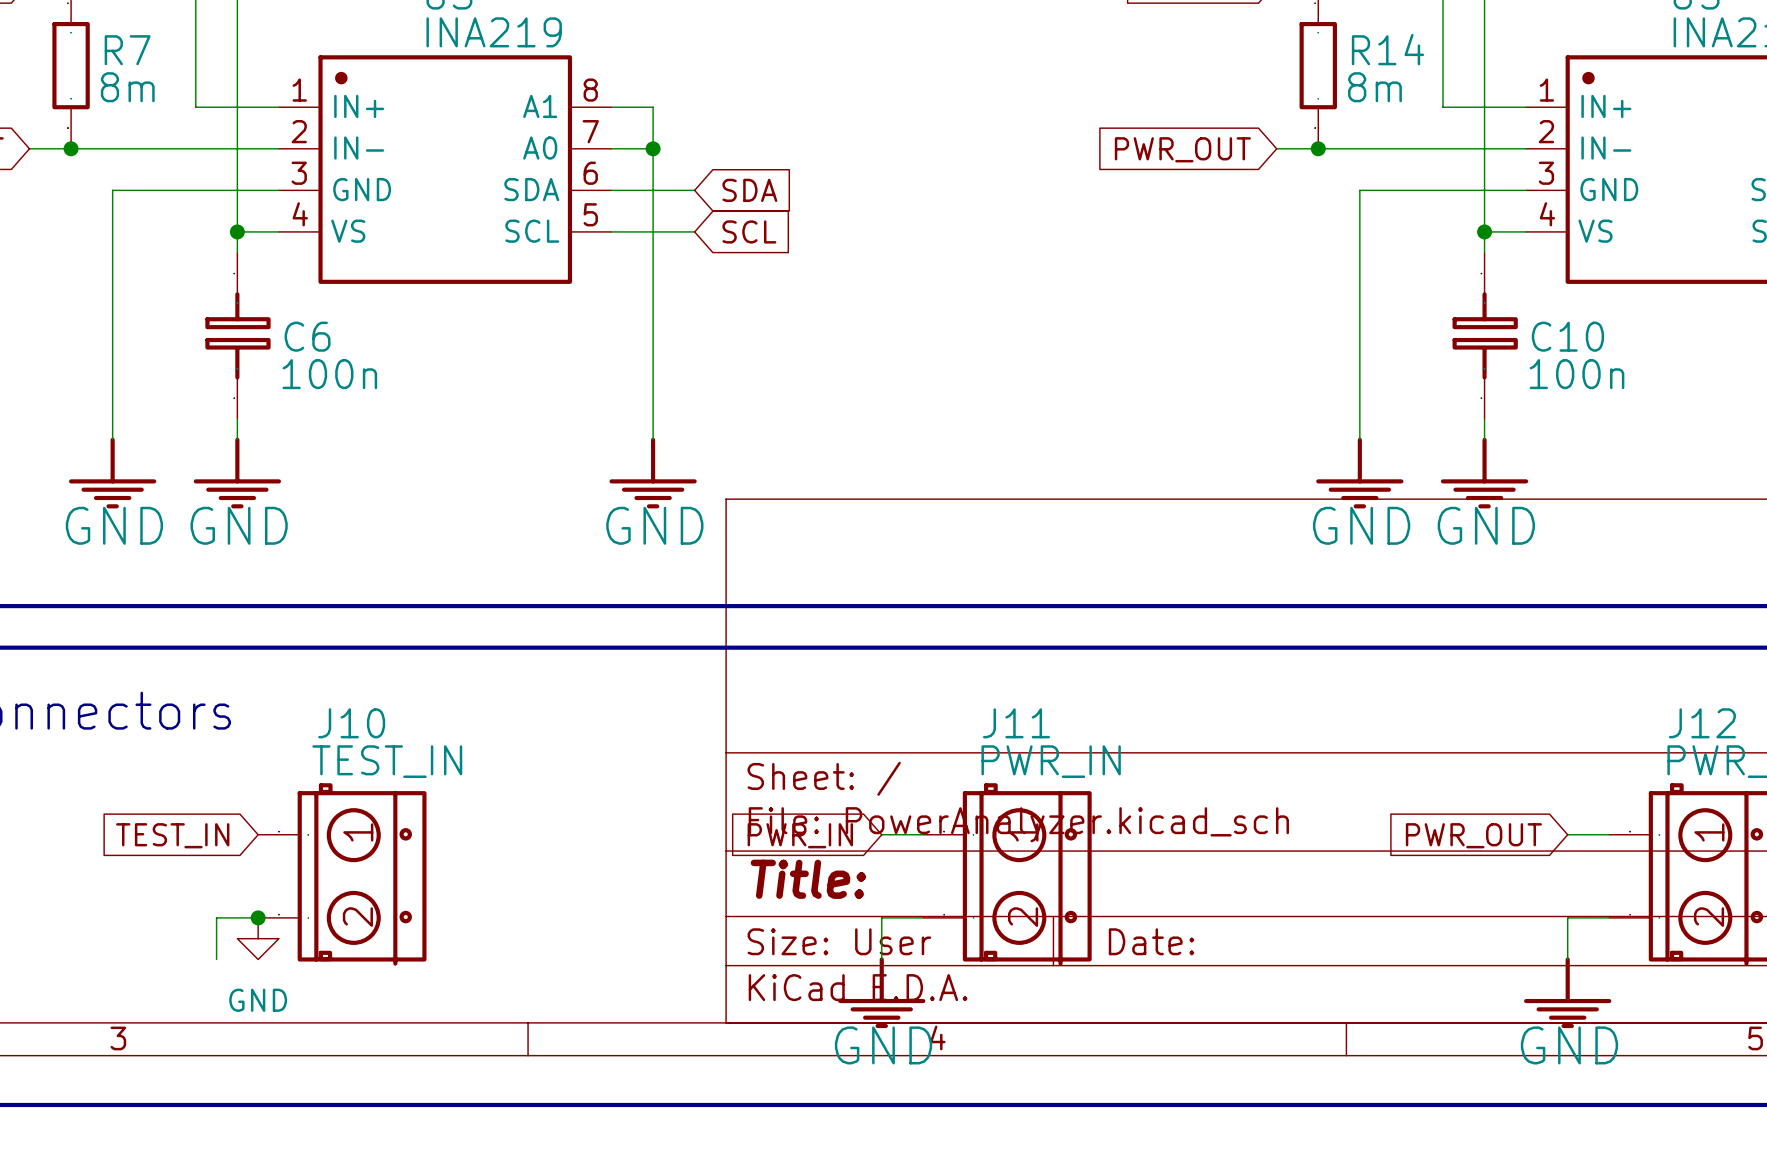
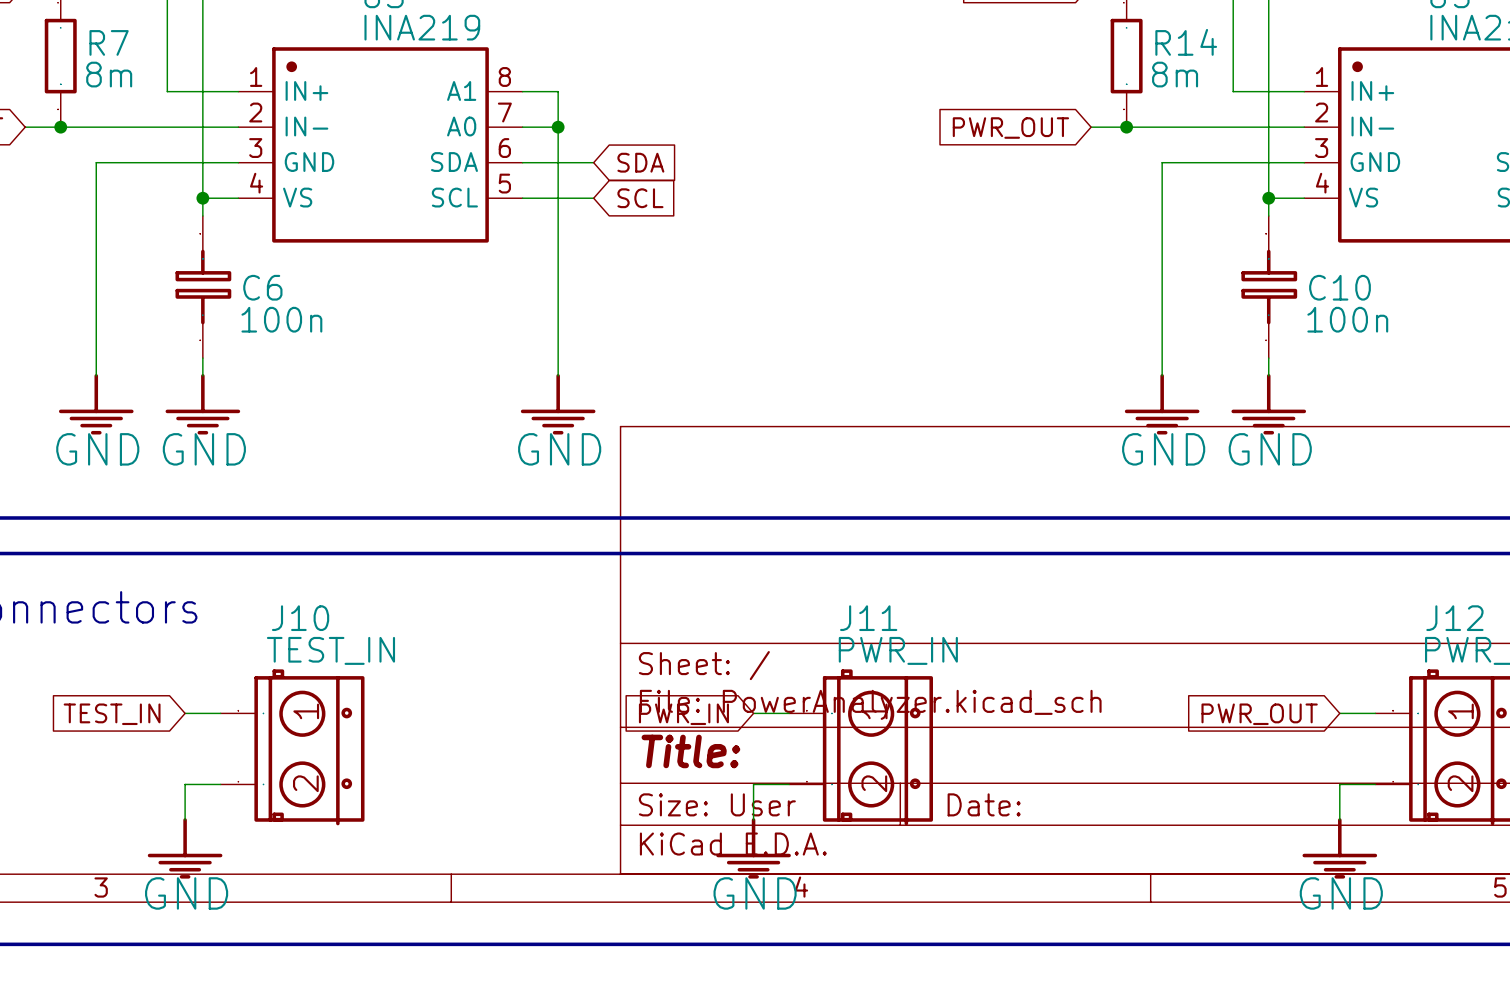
wire: none -> (185, 713) (220, 713)
global label position: TEST_IN (172, 835) -> TEST_IN (112, 714)
junction: (258, 917) -> none
power symbol: GND (258, 938) -> none
power symbol: none -> GND (185, 848)

